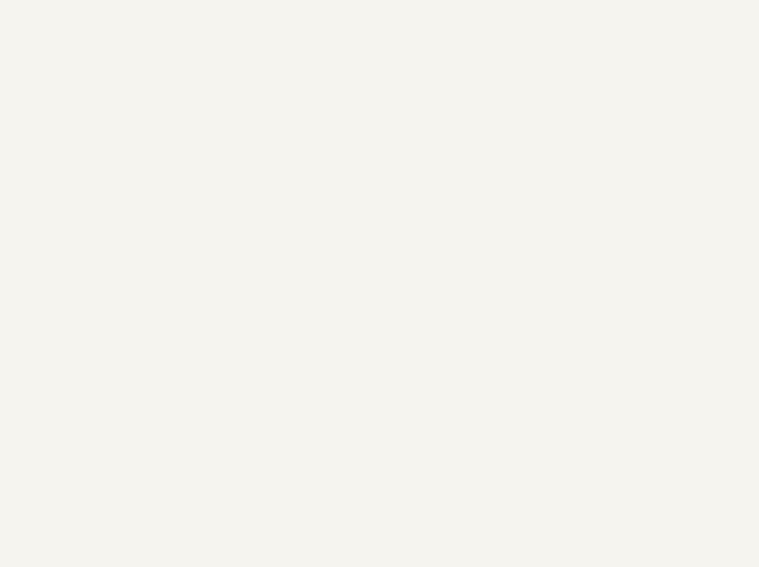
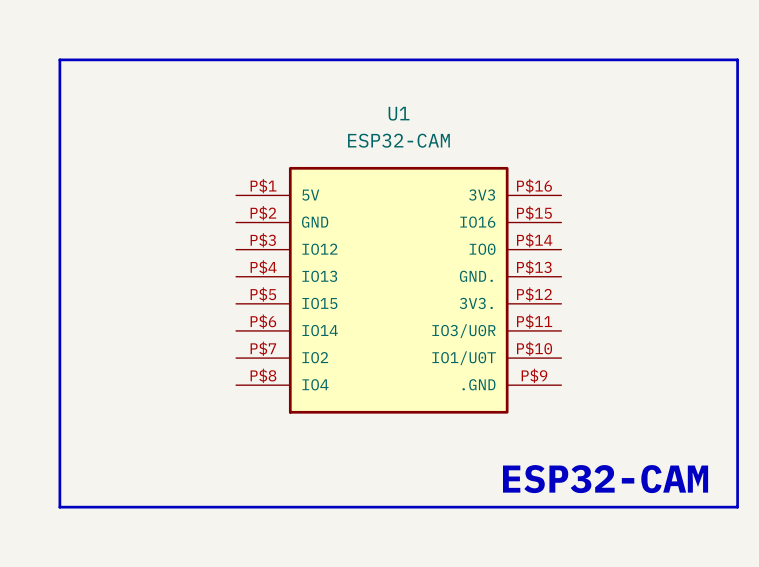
line: none -> (59, 59) (737, 59) (737, 507) (59, 507) (59, 59)
U1: none -> ESP32-CAM (398, 290)
text: none -> ESP32-CAM (605, 479)

